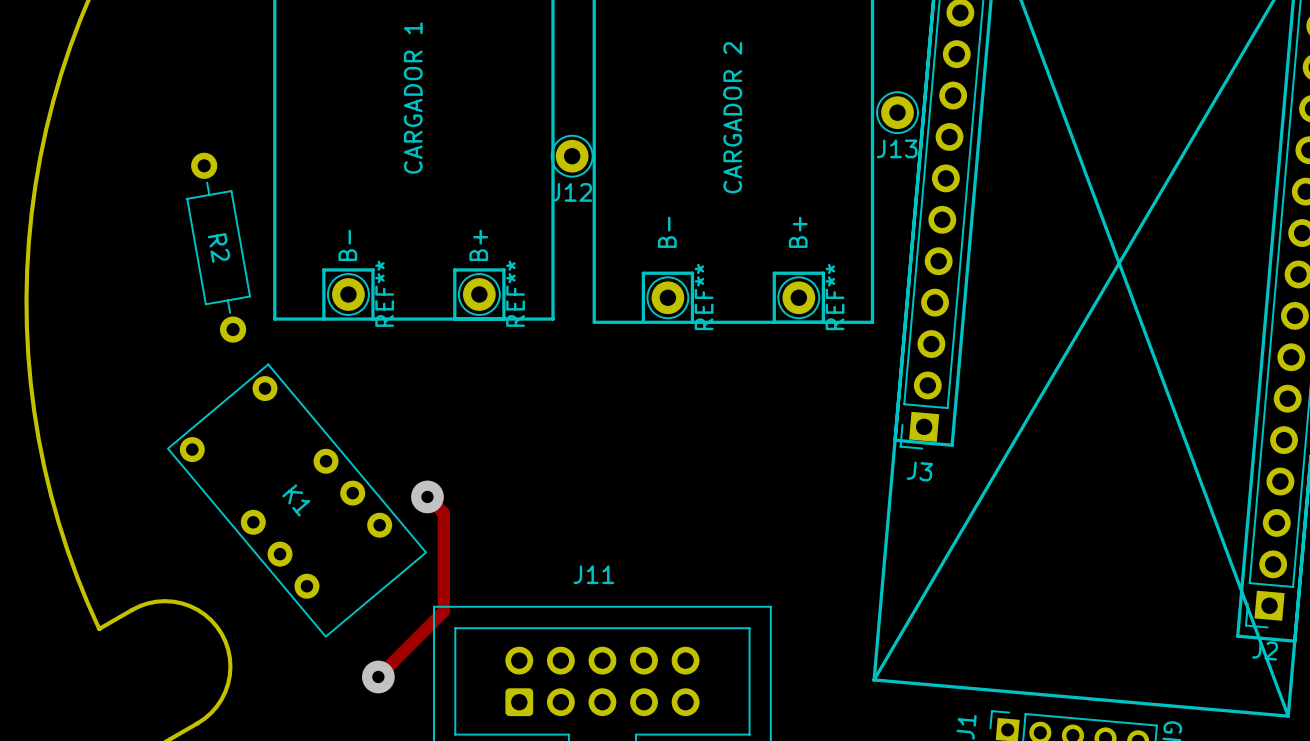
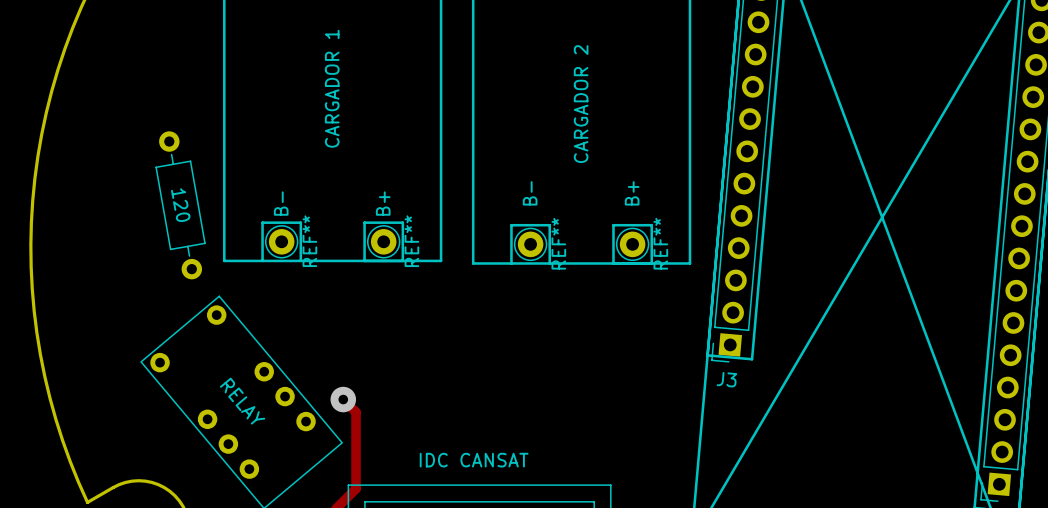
J13: (897, 112) -> none
J12: (572, 156) -> none
R2 name: R2 (219, 247) -> 120 (180, 205)
K1 name: K1 (296, 500) -> RELAY (242, 401)
J11 name: J11 (593, 574) -> IDC CANSAT (474, 460)

